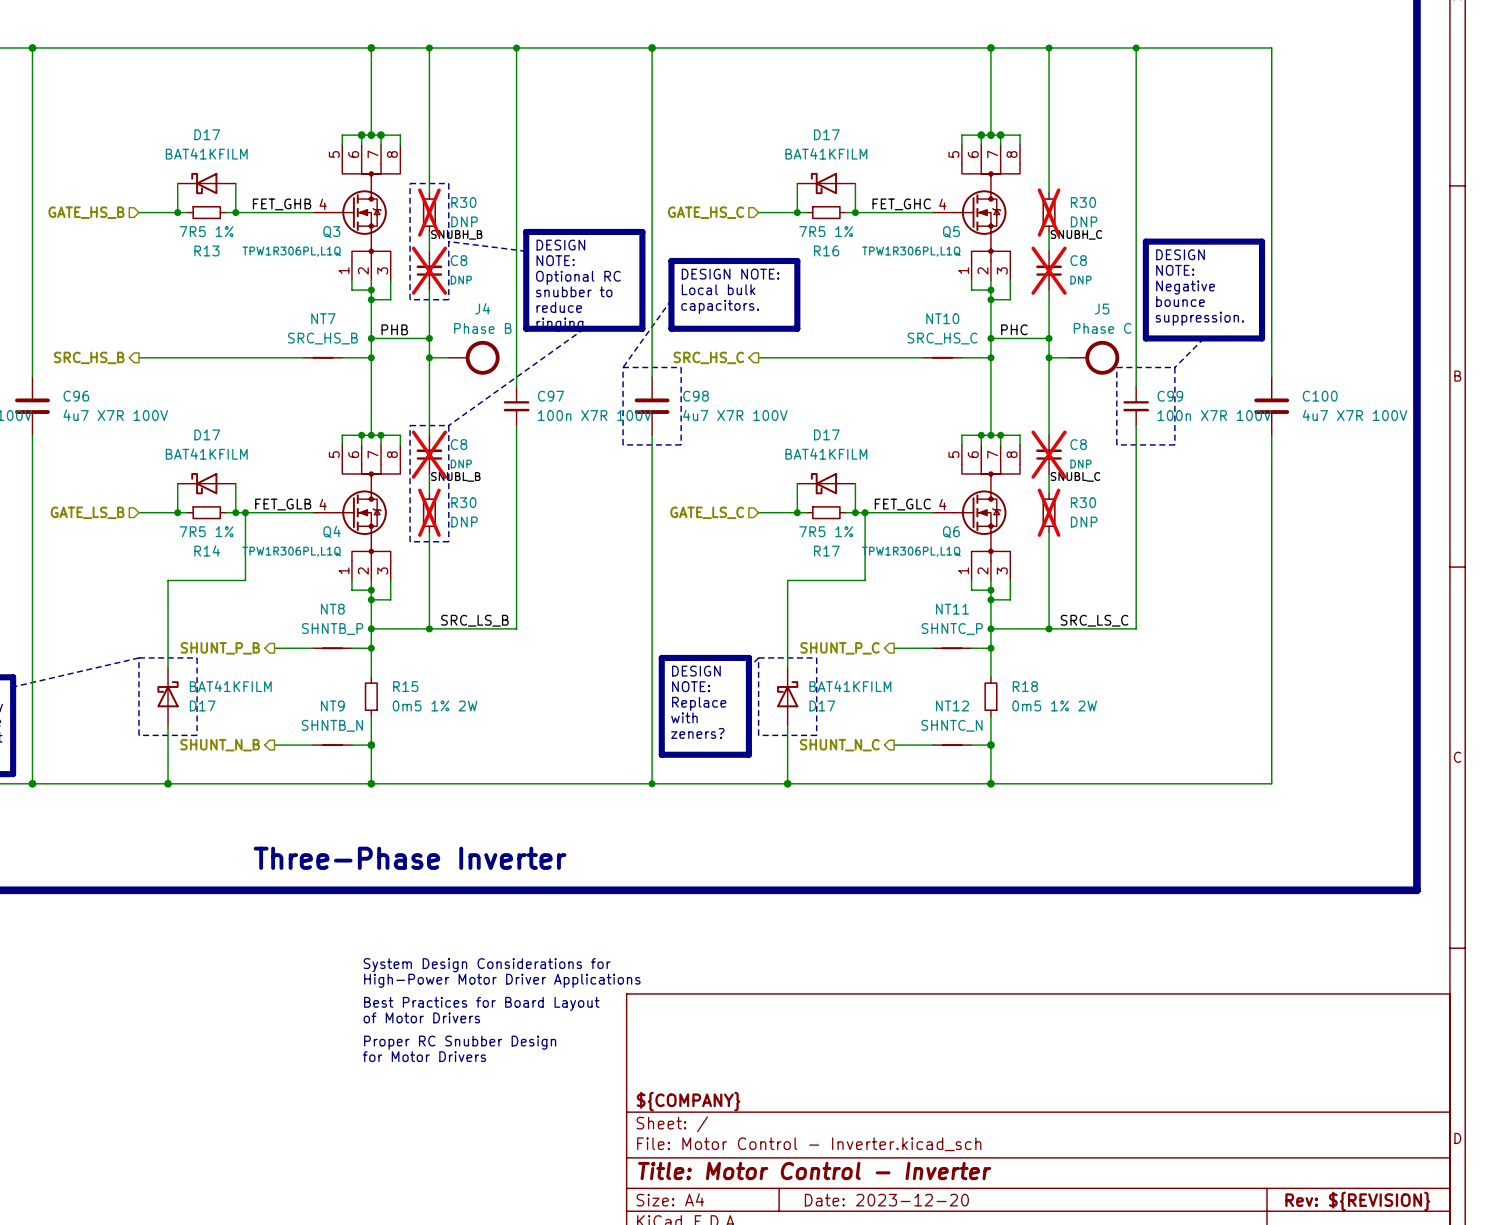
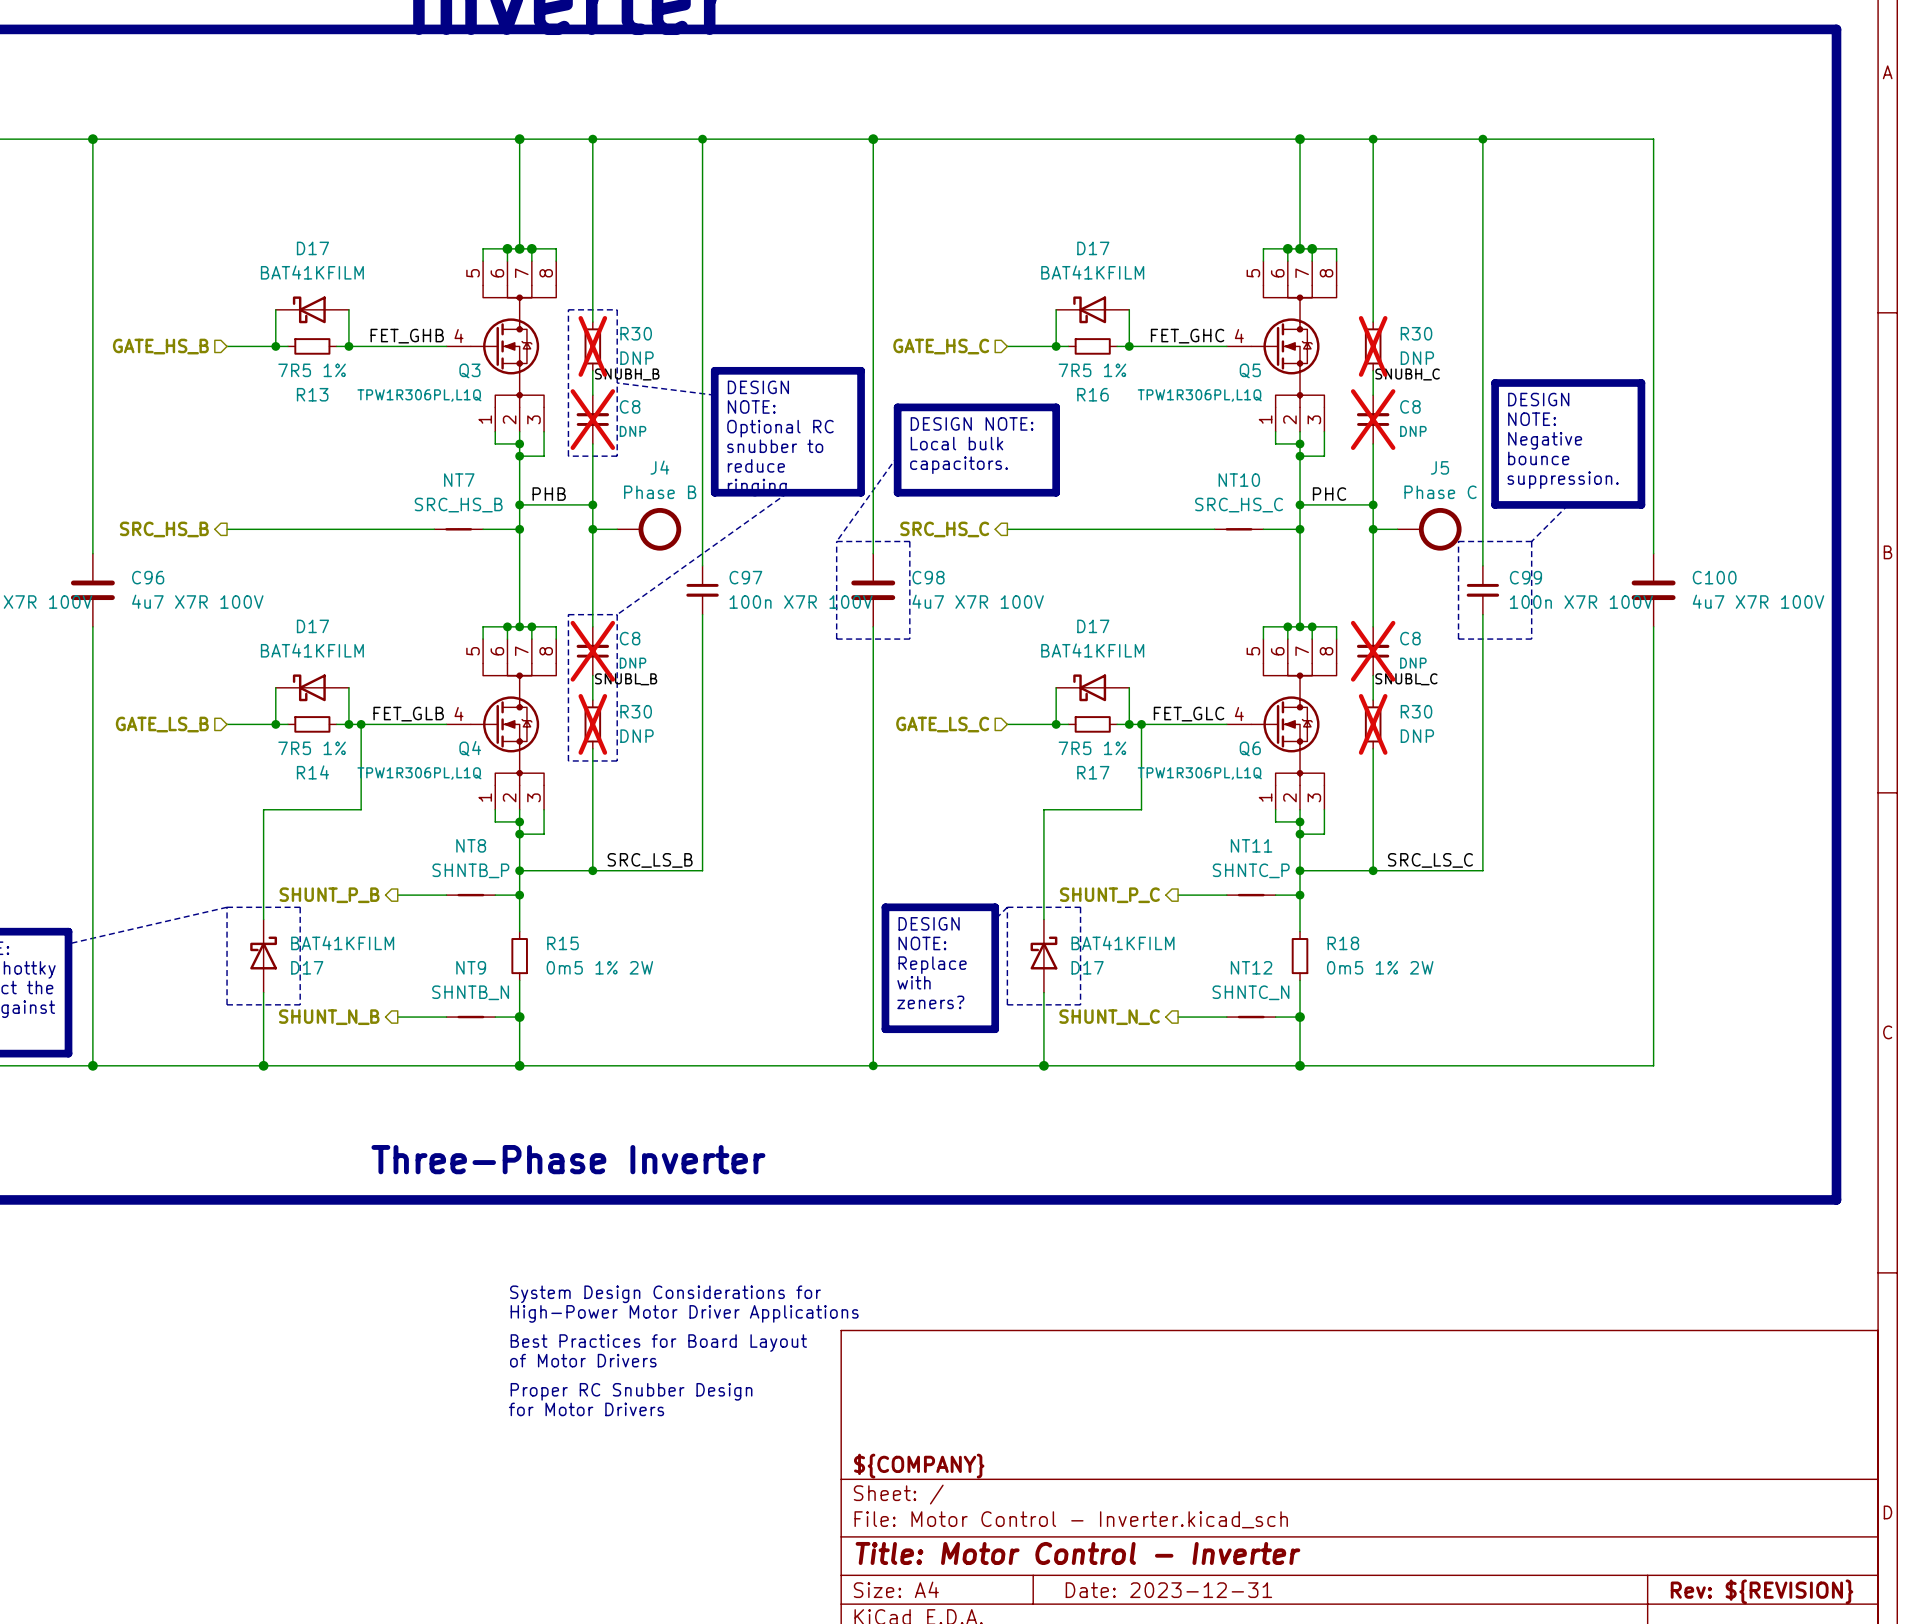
title block: Date: 2023-12-20 (886, 1200) -> Date: 2023-12-31 (1168, 1590)

